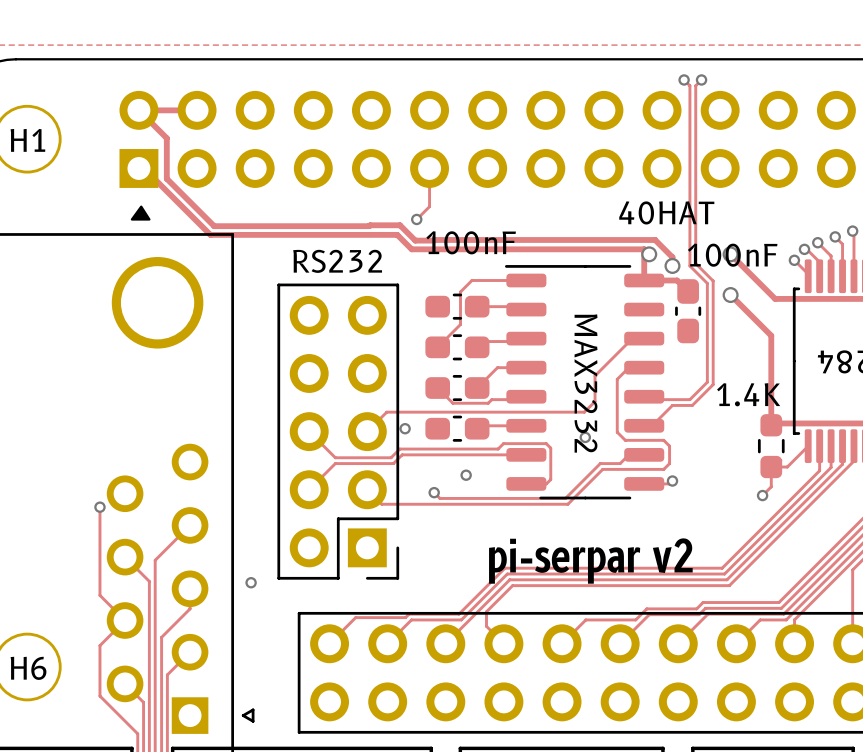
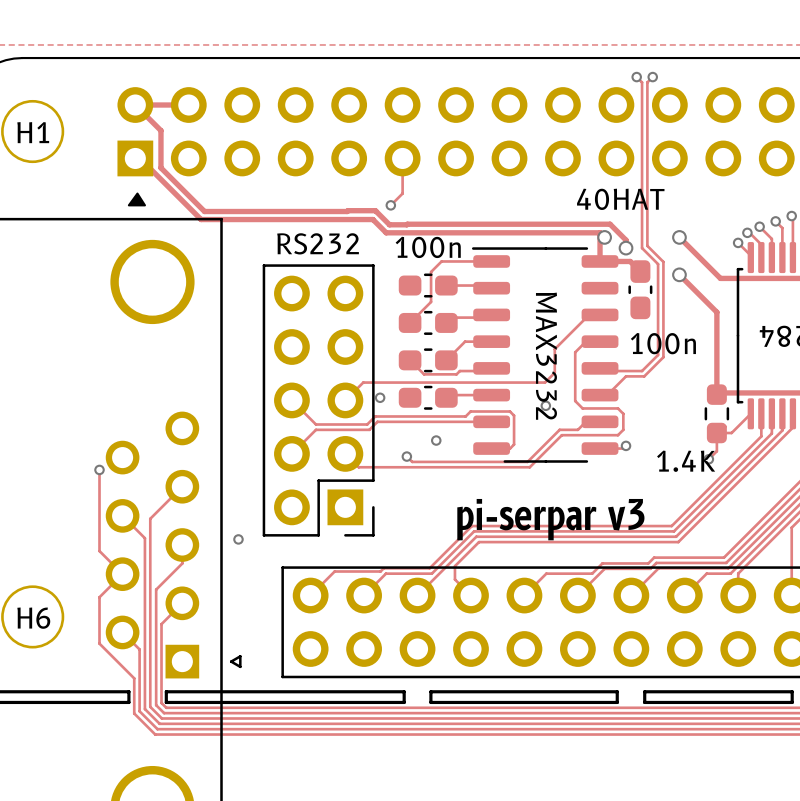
part value: 100nF (471, 242) -> 100n (428, 247)
part value: 100nF (732, 255) -> 100n (663, 343)
part value position: 1.4K (748, 394) -> 1.4K (686, 461)
text: pi-serpar v2 (590, 561) -> pi-serpar v3 (550, 519)

